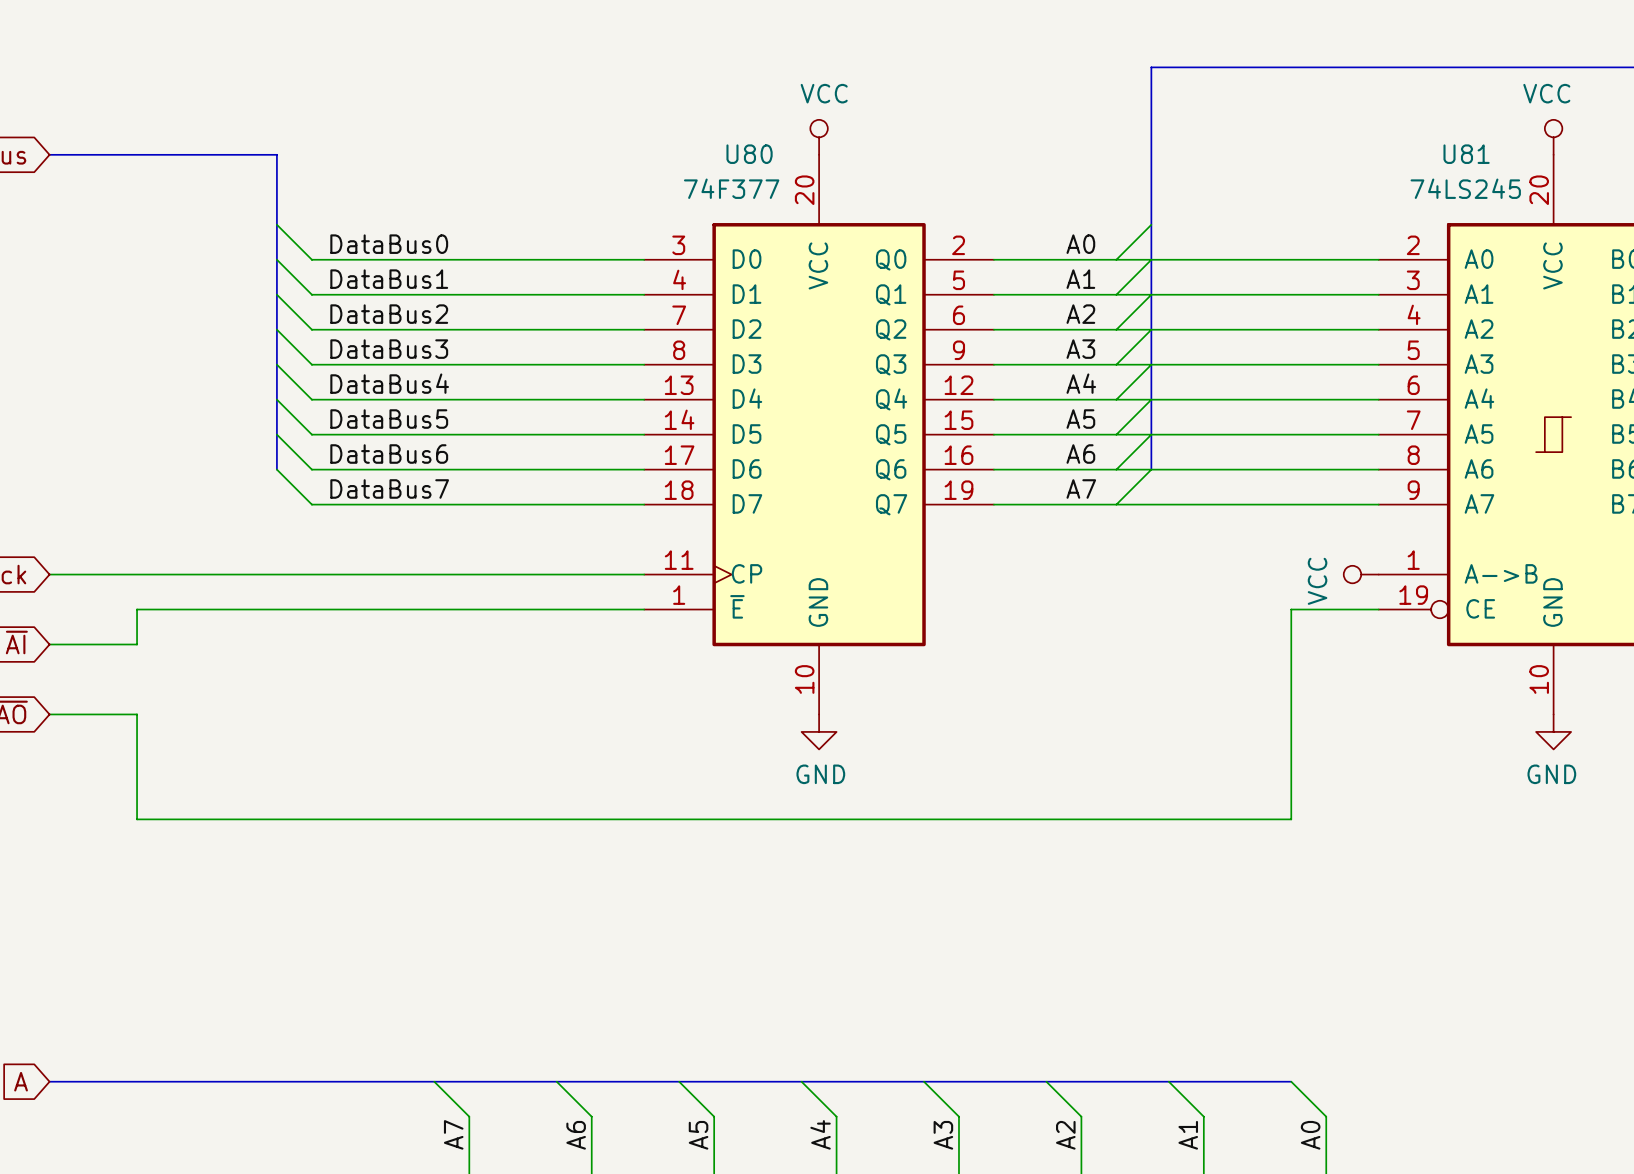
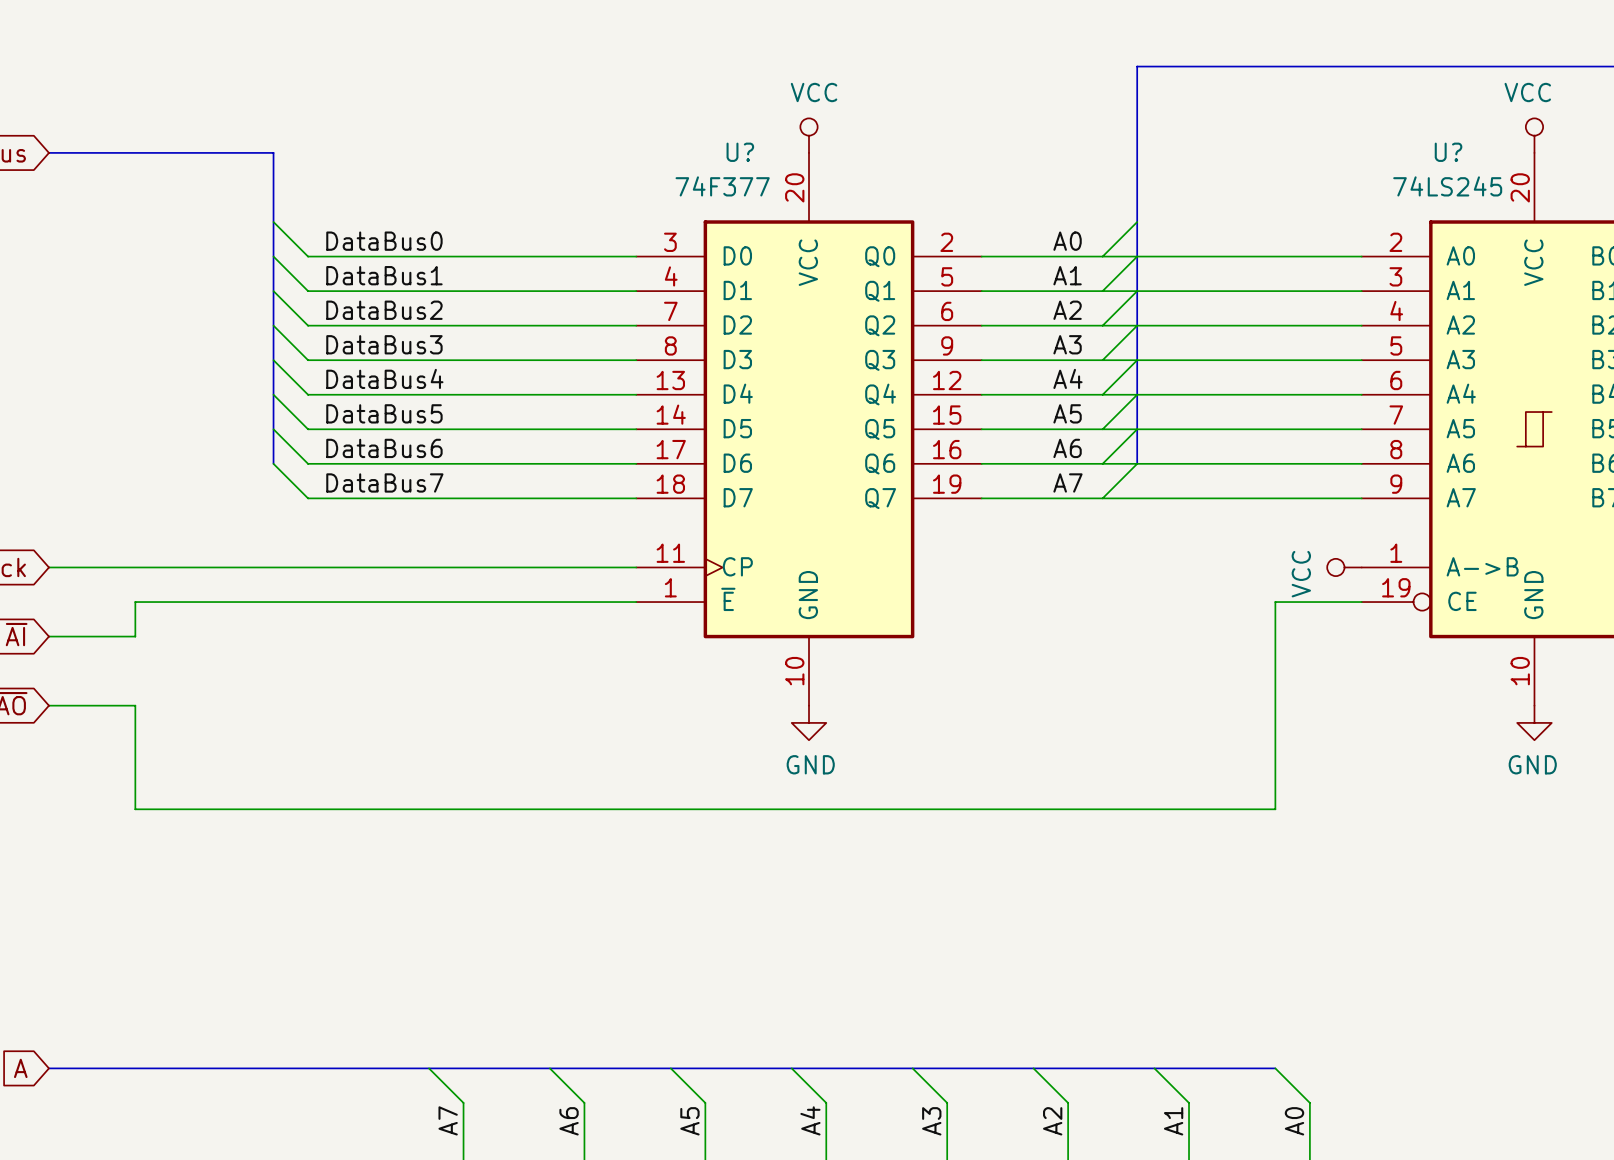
U80 name: U80 (749, 154) -> U? (740, 152)
U81 name: U81 (1466, 154) -> U? (1448, 152)

